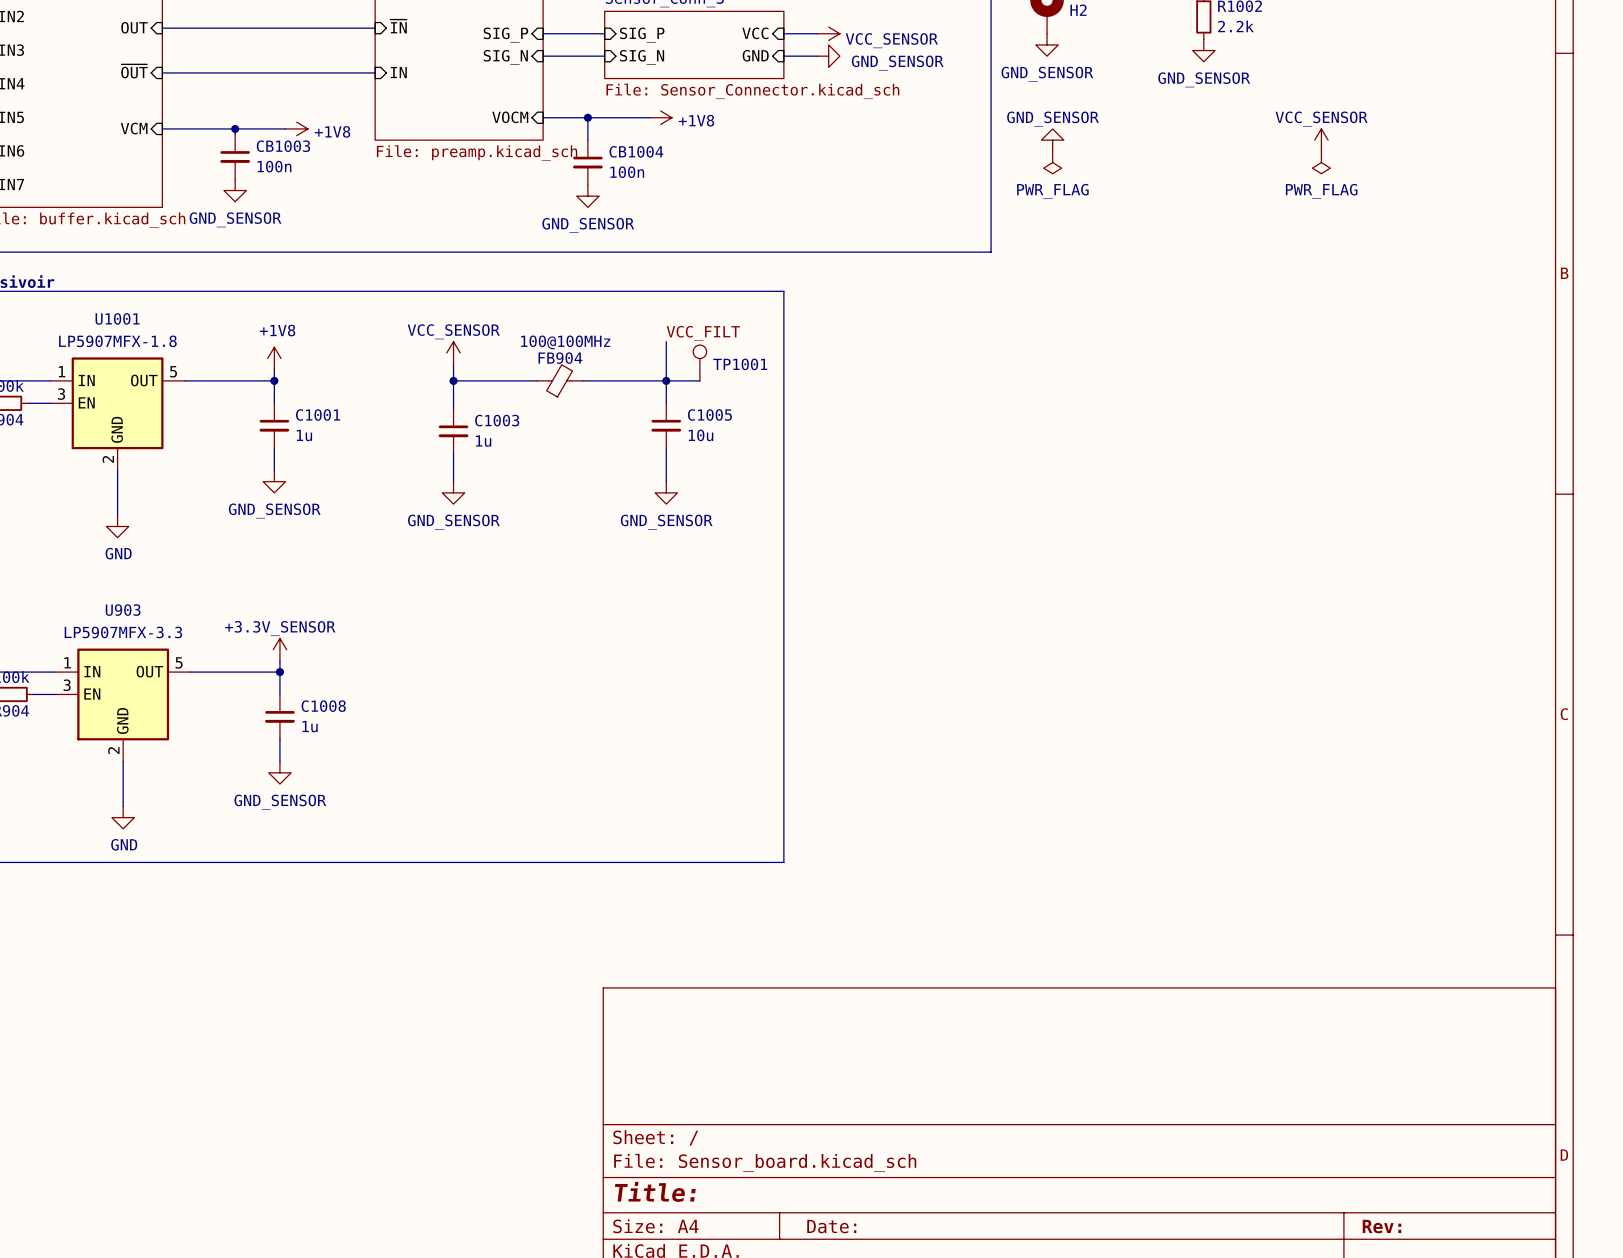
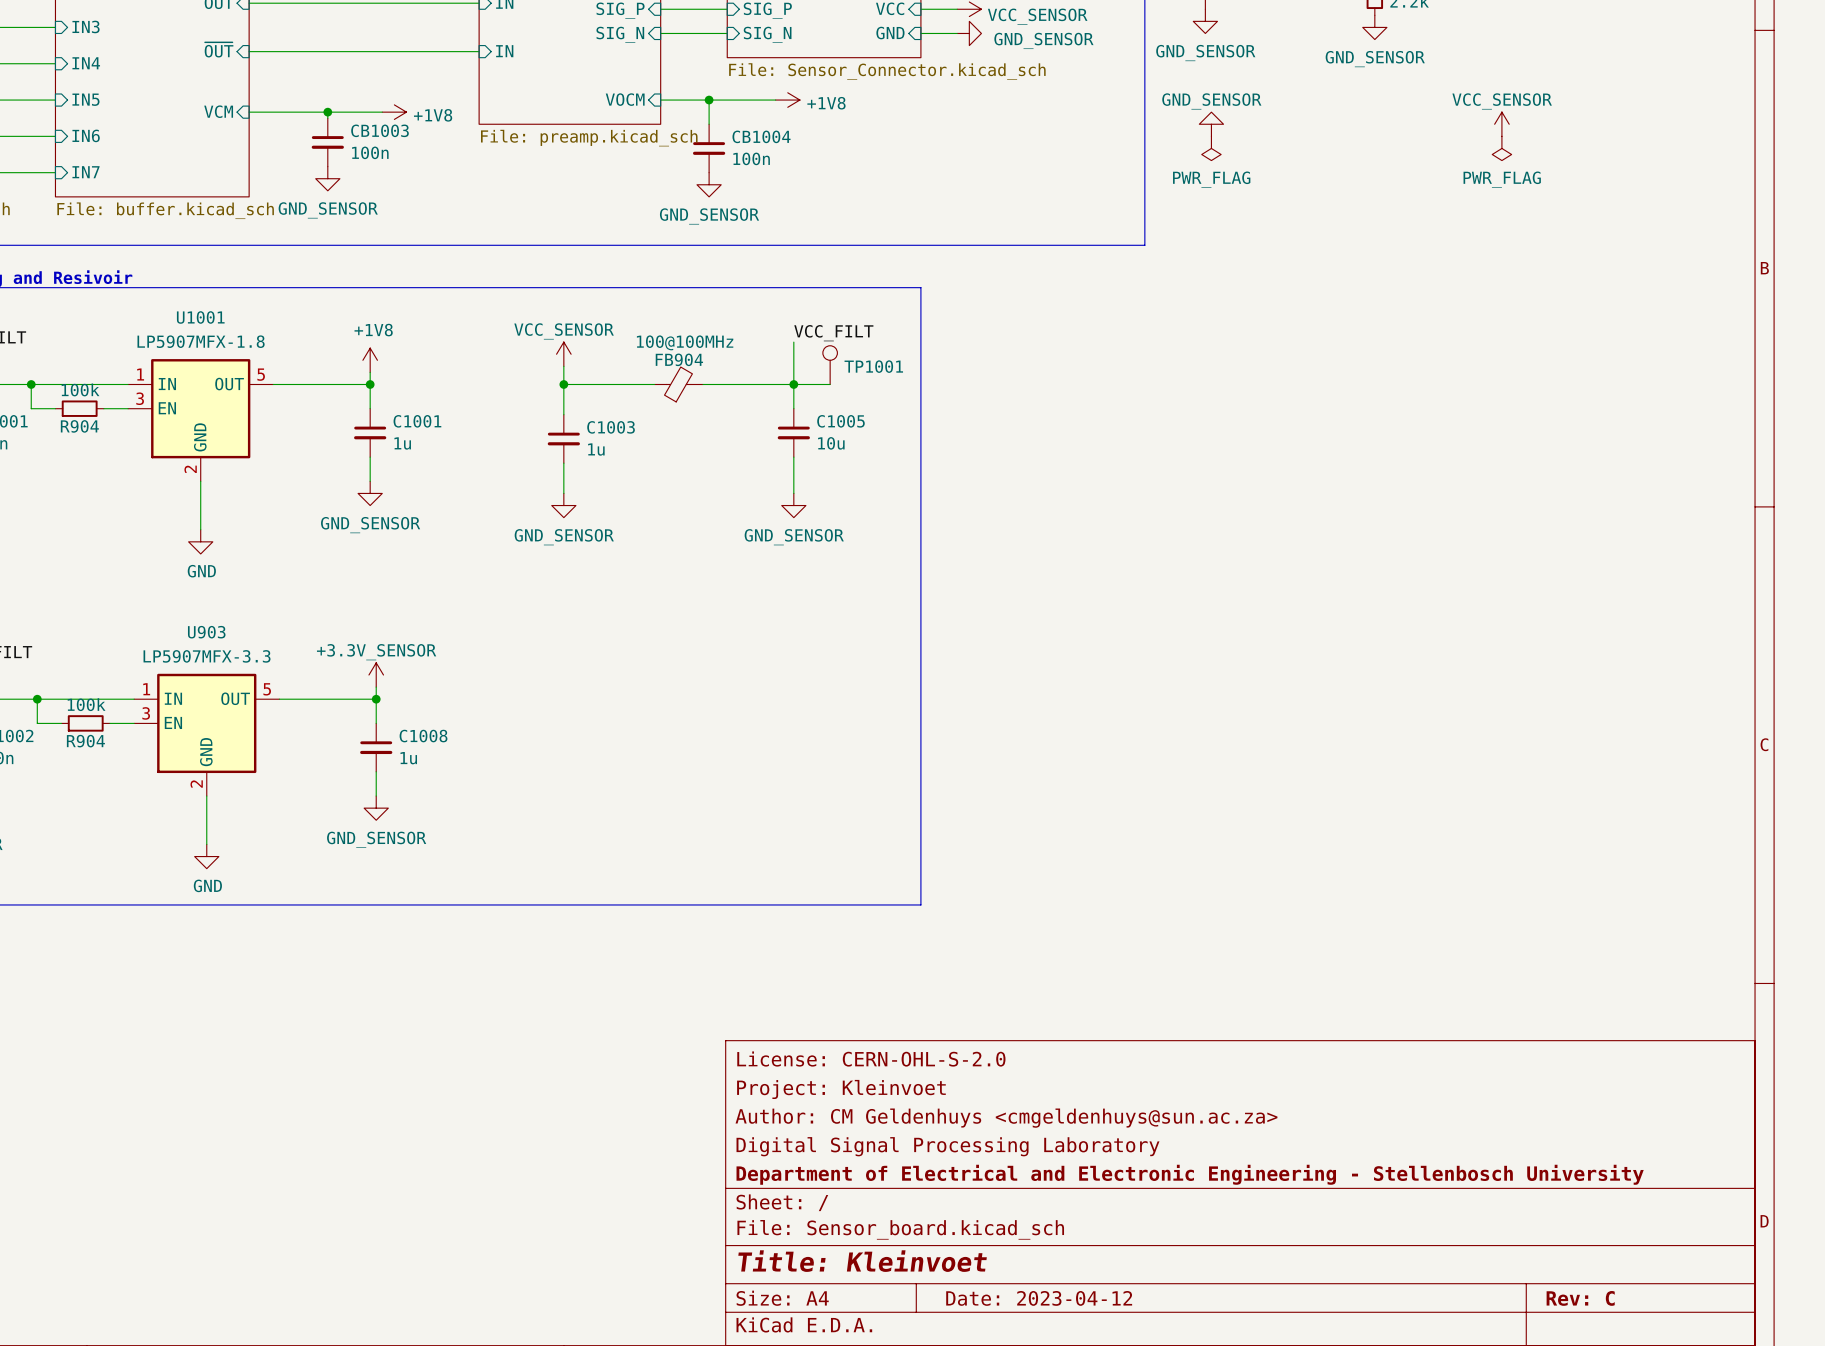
title block: none -> License: CERN-OHL-S-2.0 (871, 1059)
title block: none -> Project: Kleinvoet (841, 1089)
title block: none -> Author: CM Geldenhuys <cmgeldenhuys@sun.ac.za> (1006, 1118)
title block: none -> Digital Signal Processing Laboratory (947, 1146)
title block: none -> Department of Electrical and Electronic Engineering - Stellenbosch University (1190, 1174)
title block: Title: (655, 1191) -> Title: Kleinvoet (862, 1261)
title block: Date: (831, 1226) -> Date: 2023-04-12 (1039, 1298)
title block: Rev: (1382, 1226) -> Rev: C (1580, 1298)

